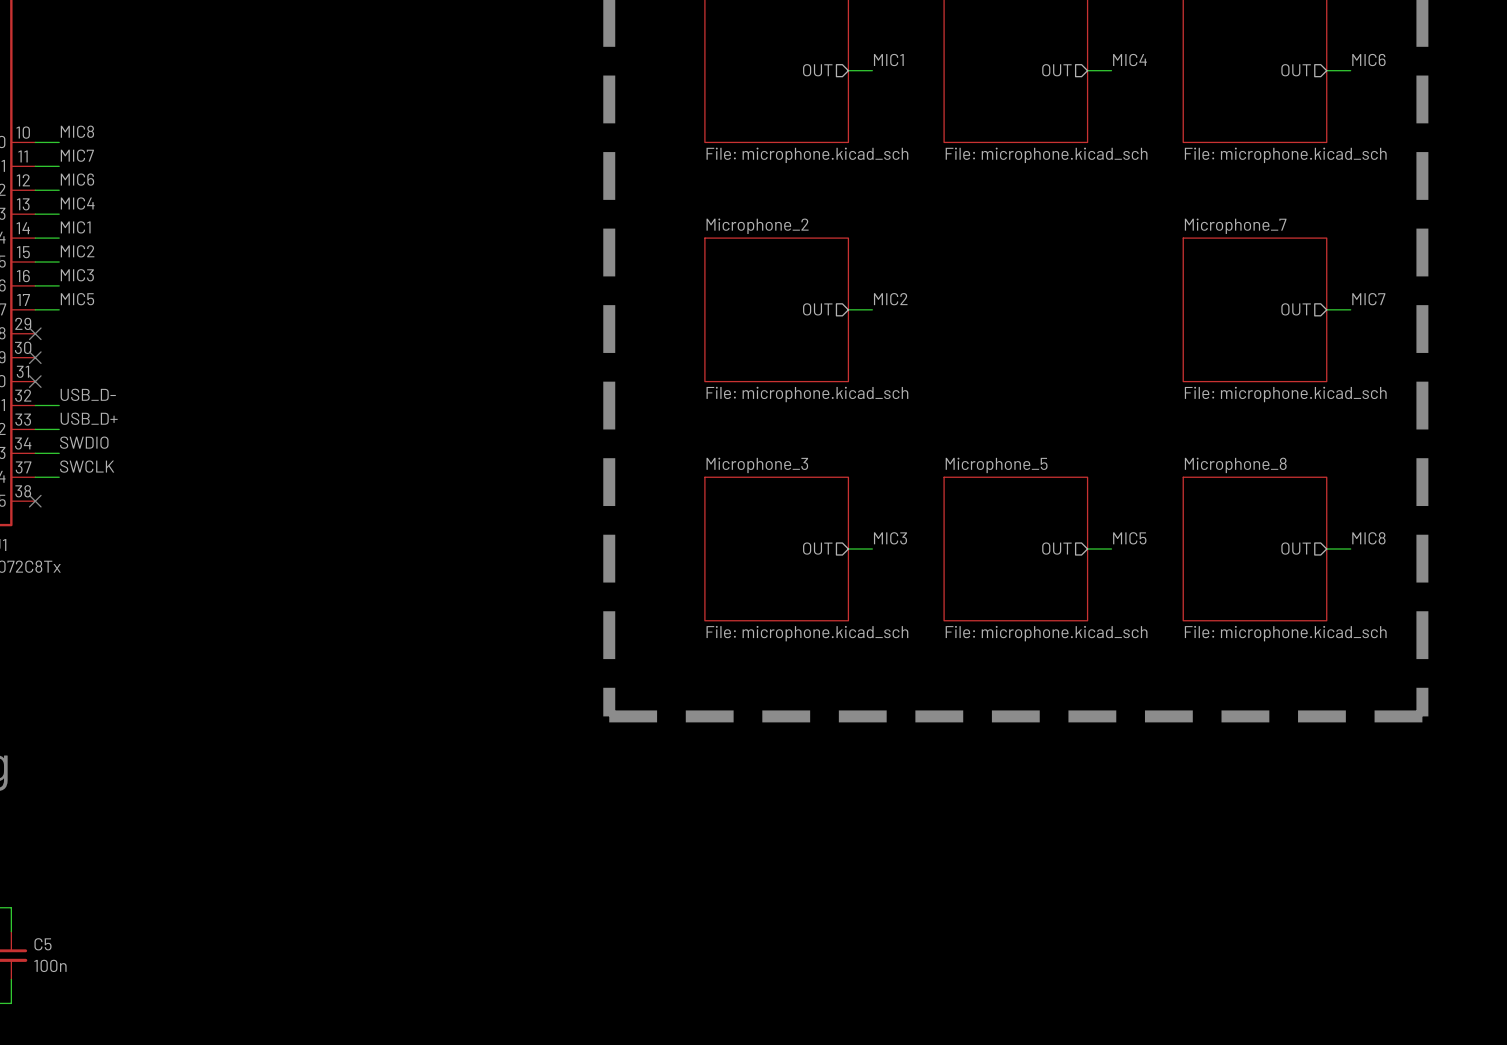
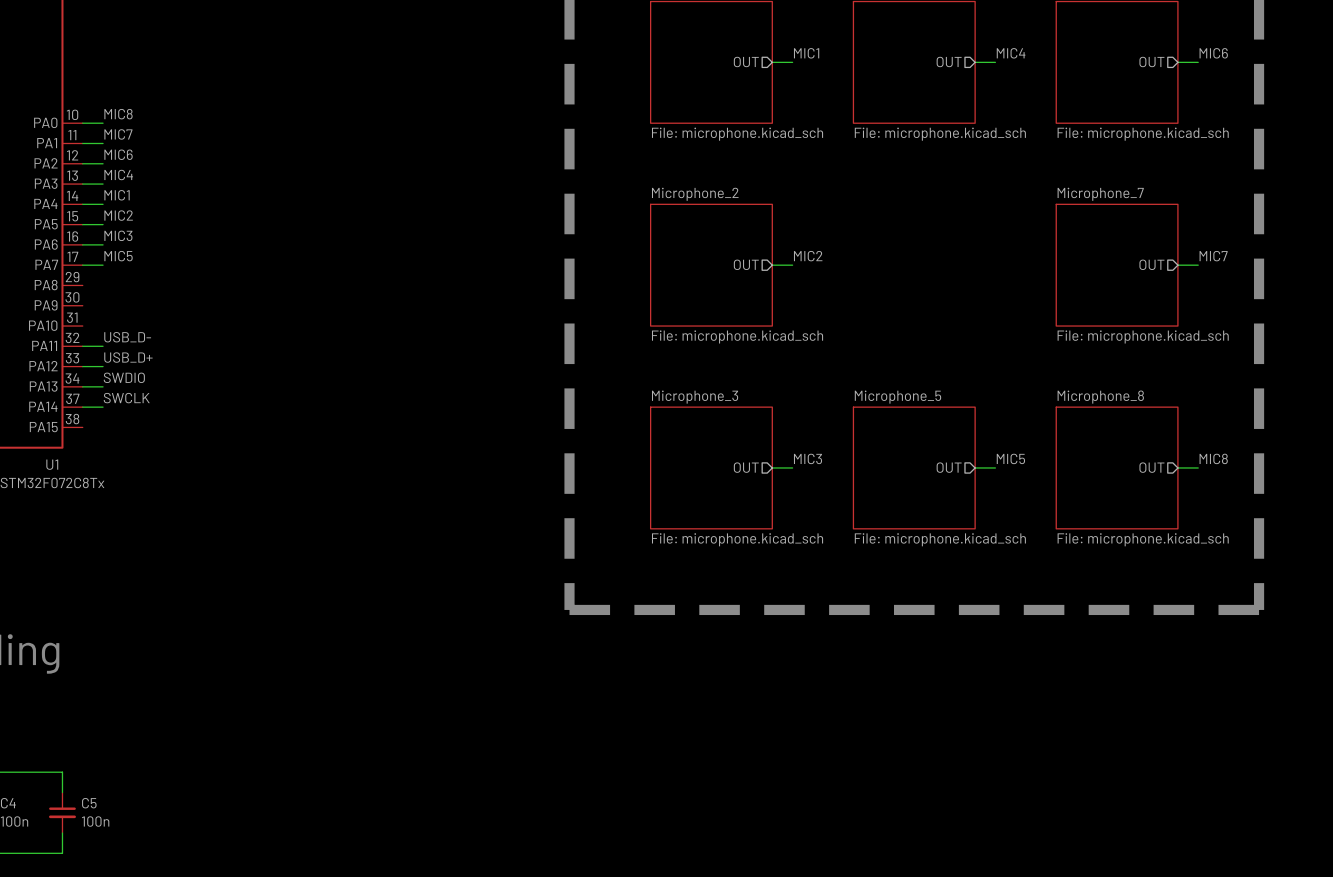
no-connect mark: (35, 333) -> none
no-connect mark: (35, 357) -> none
no-connect mark: (35, 381) -> none
no-connect mark: (35, 501) -> none

